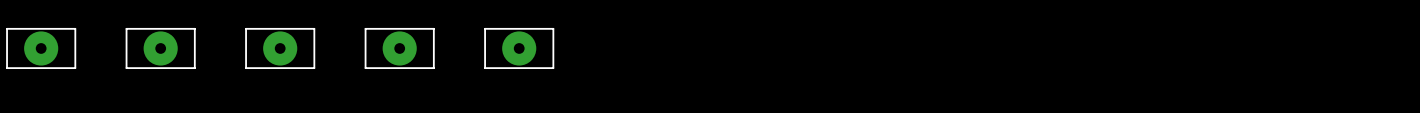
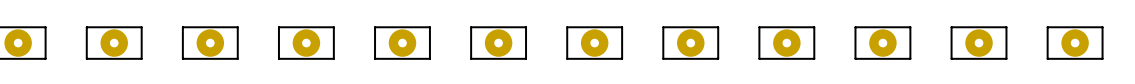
part: none -> (498, 43)
part: none -> (594, 43)
part: none -> (690, 43)
part: none -> (786, 43)
part: none -> (882, 43)
part: none -> (979, 43)
part: none -> (1075, 43)

